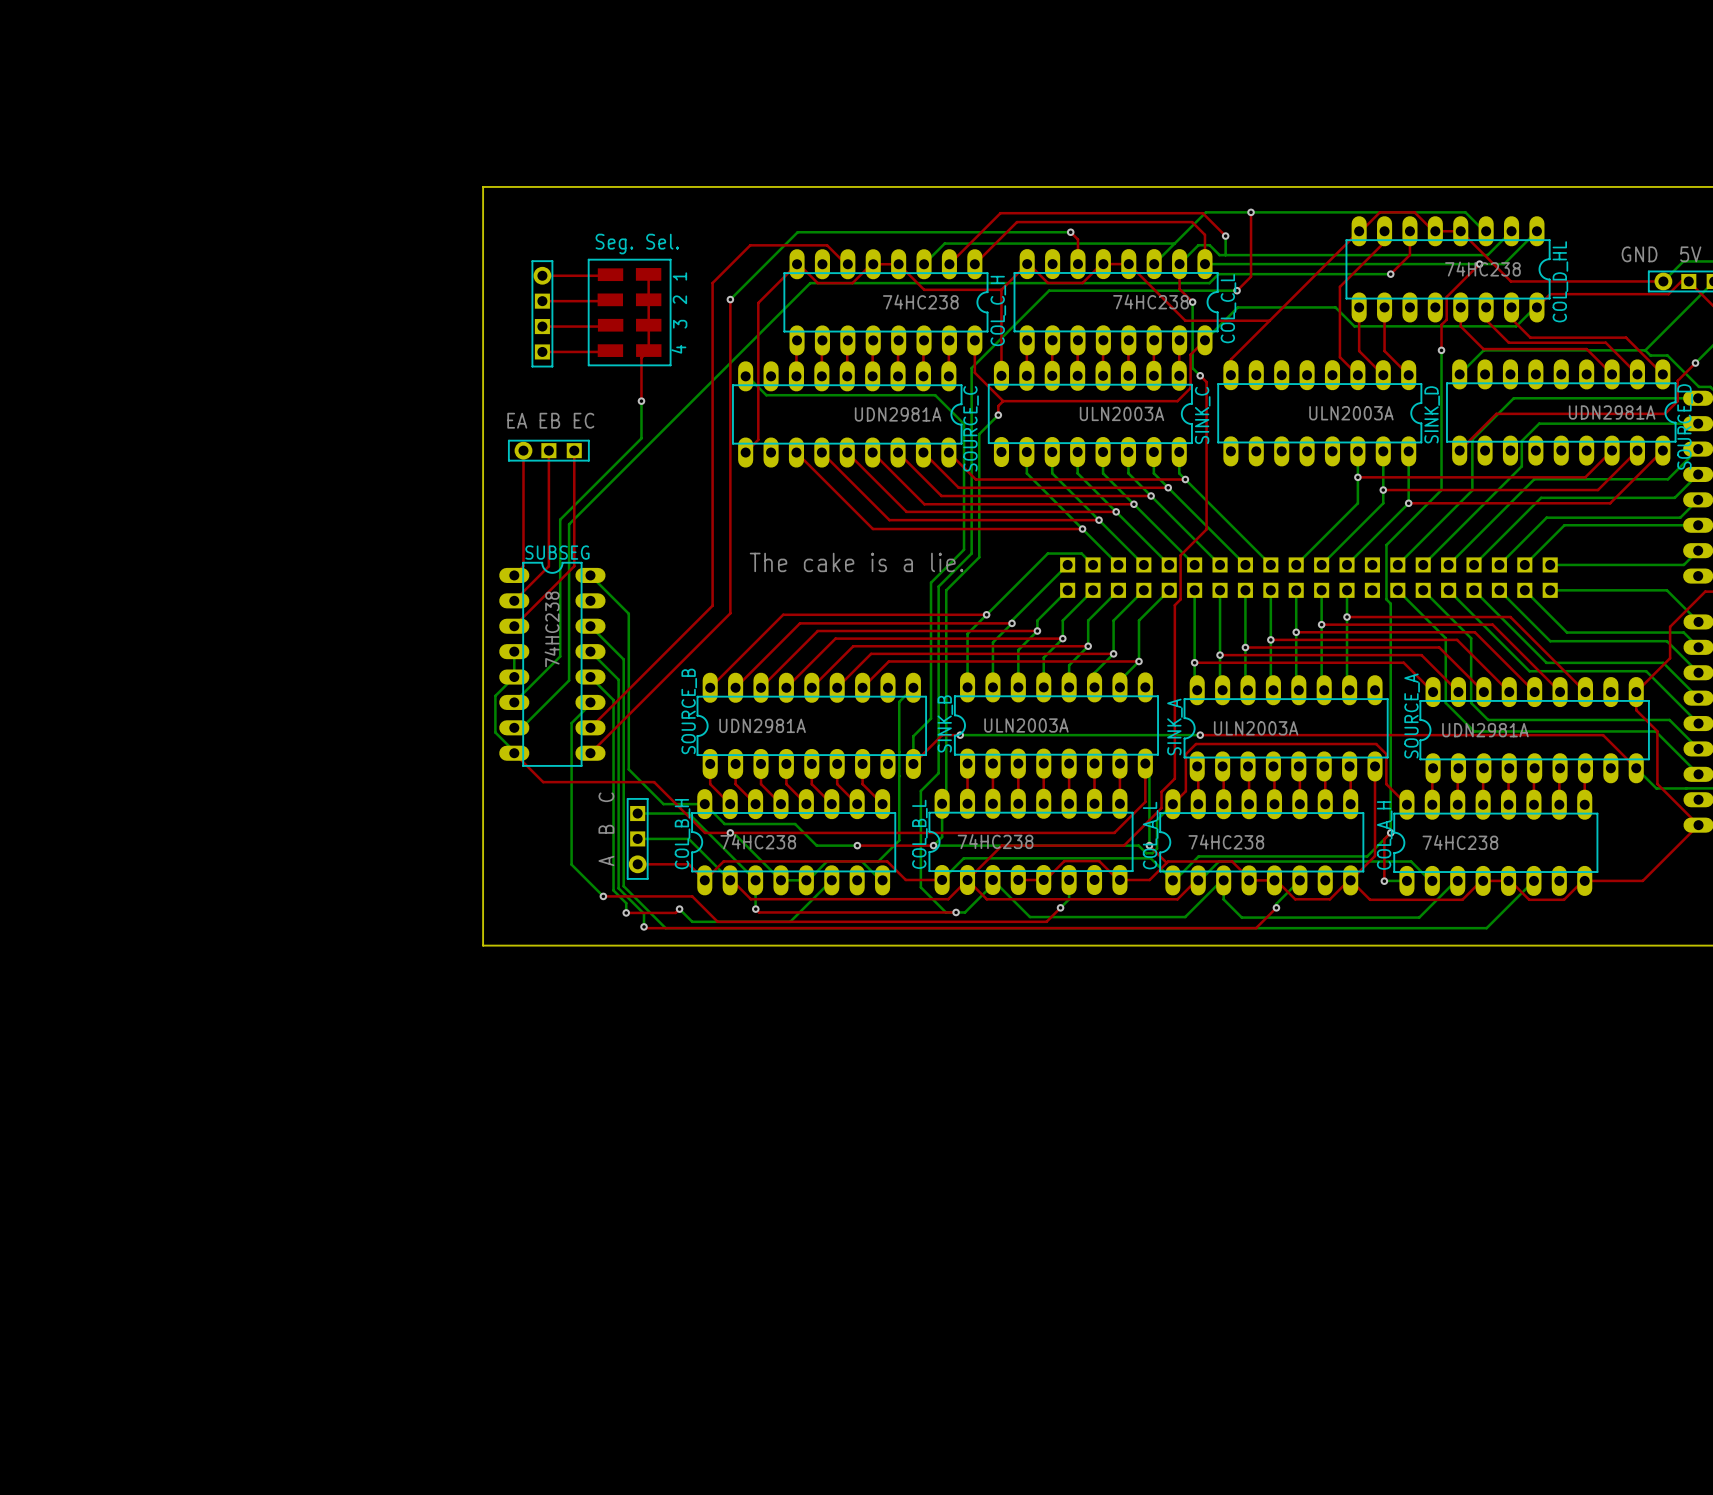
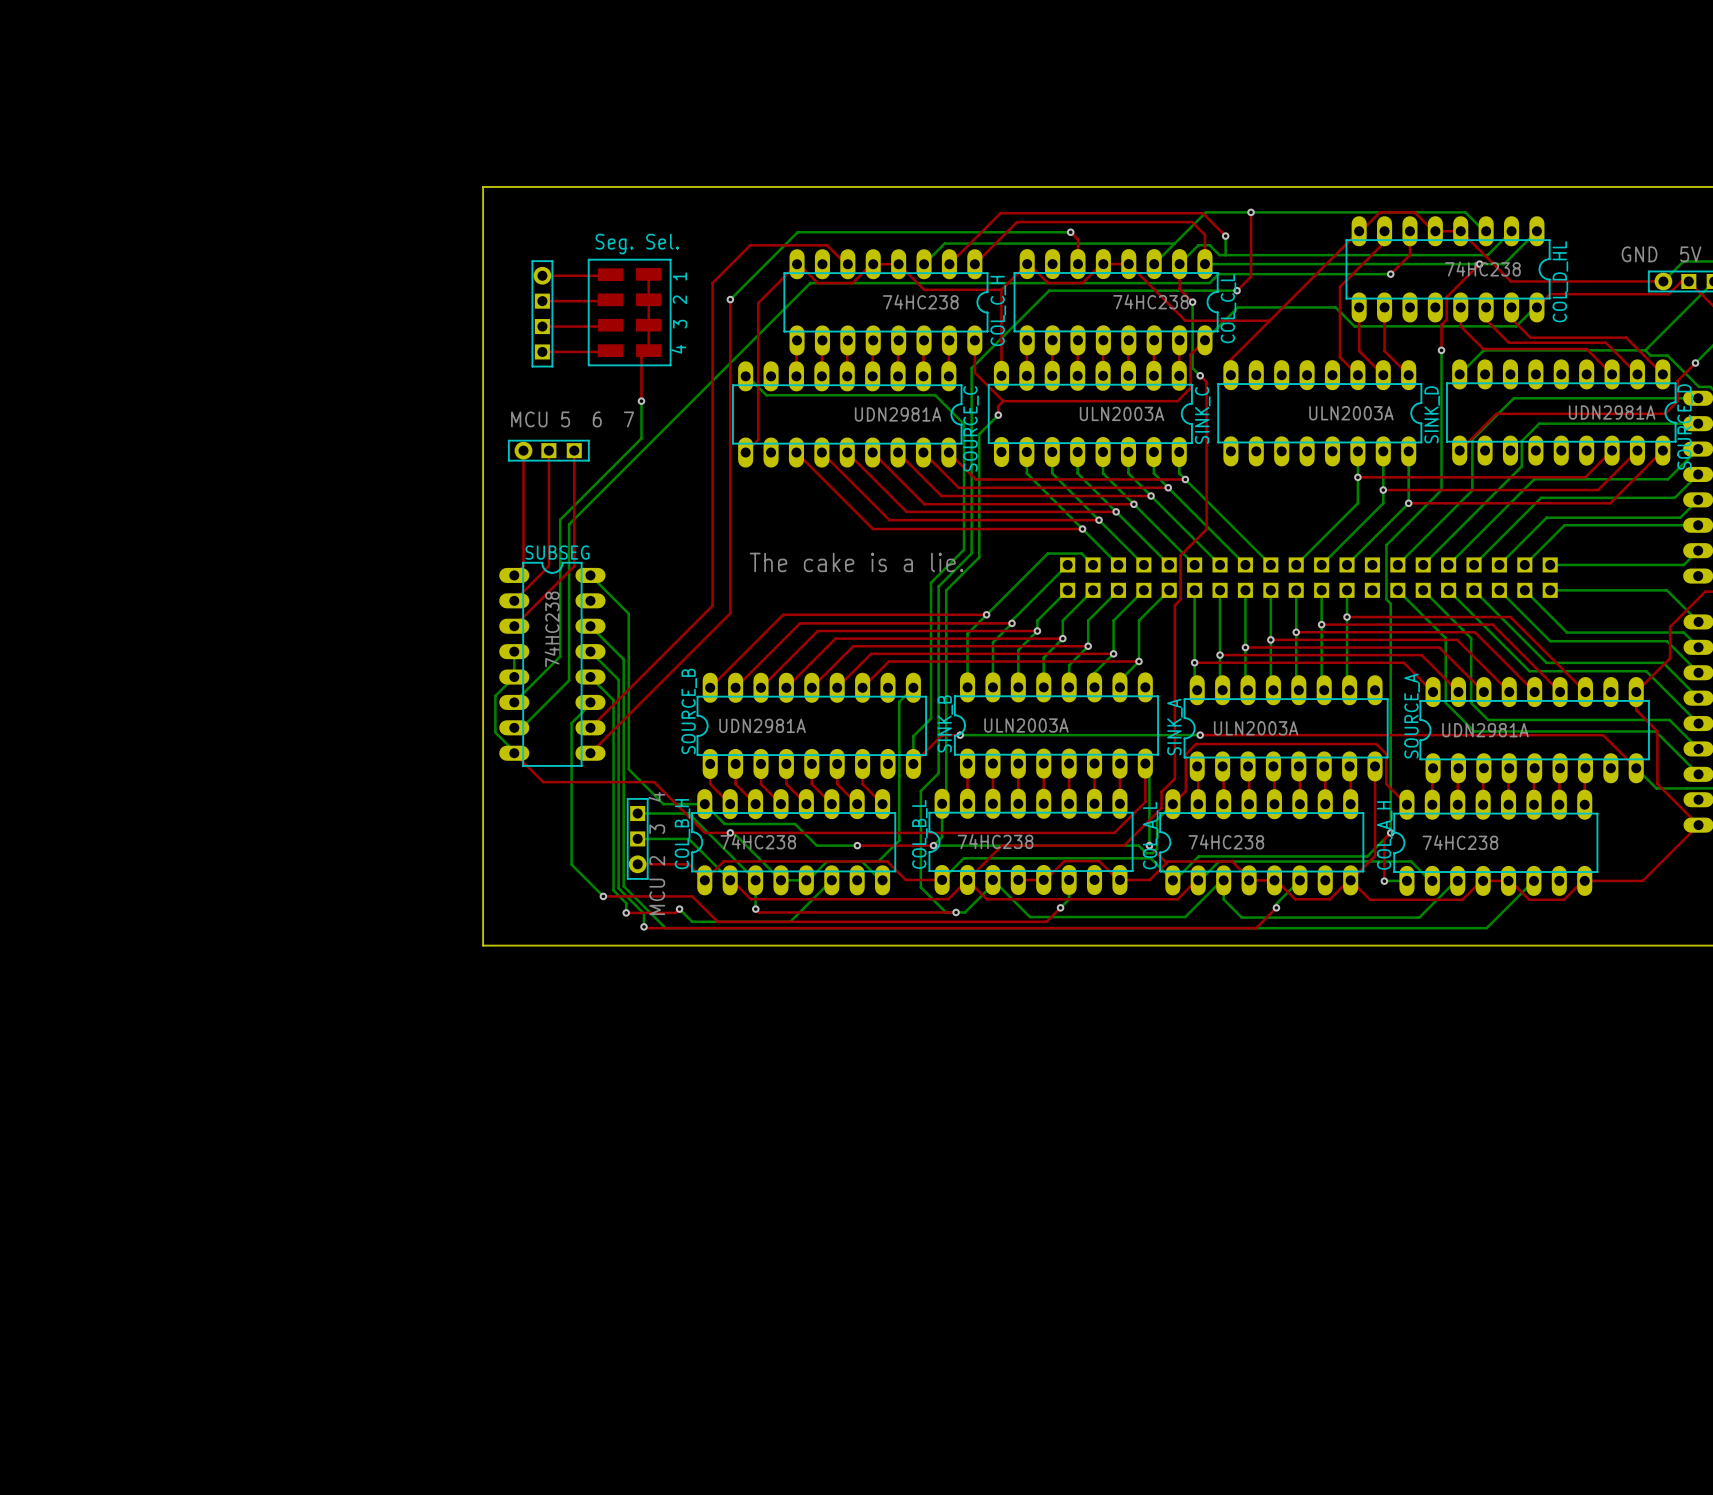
text: EA EB EC (550, 420) -> MCU 5 6 7 (572, 419)
text: A B C (606, 829) -> none
text: none -> MCU 2 3 4 (656, 853)

